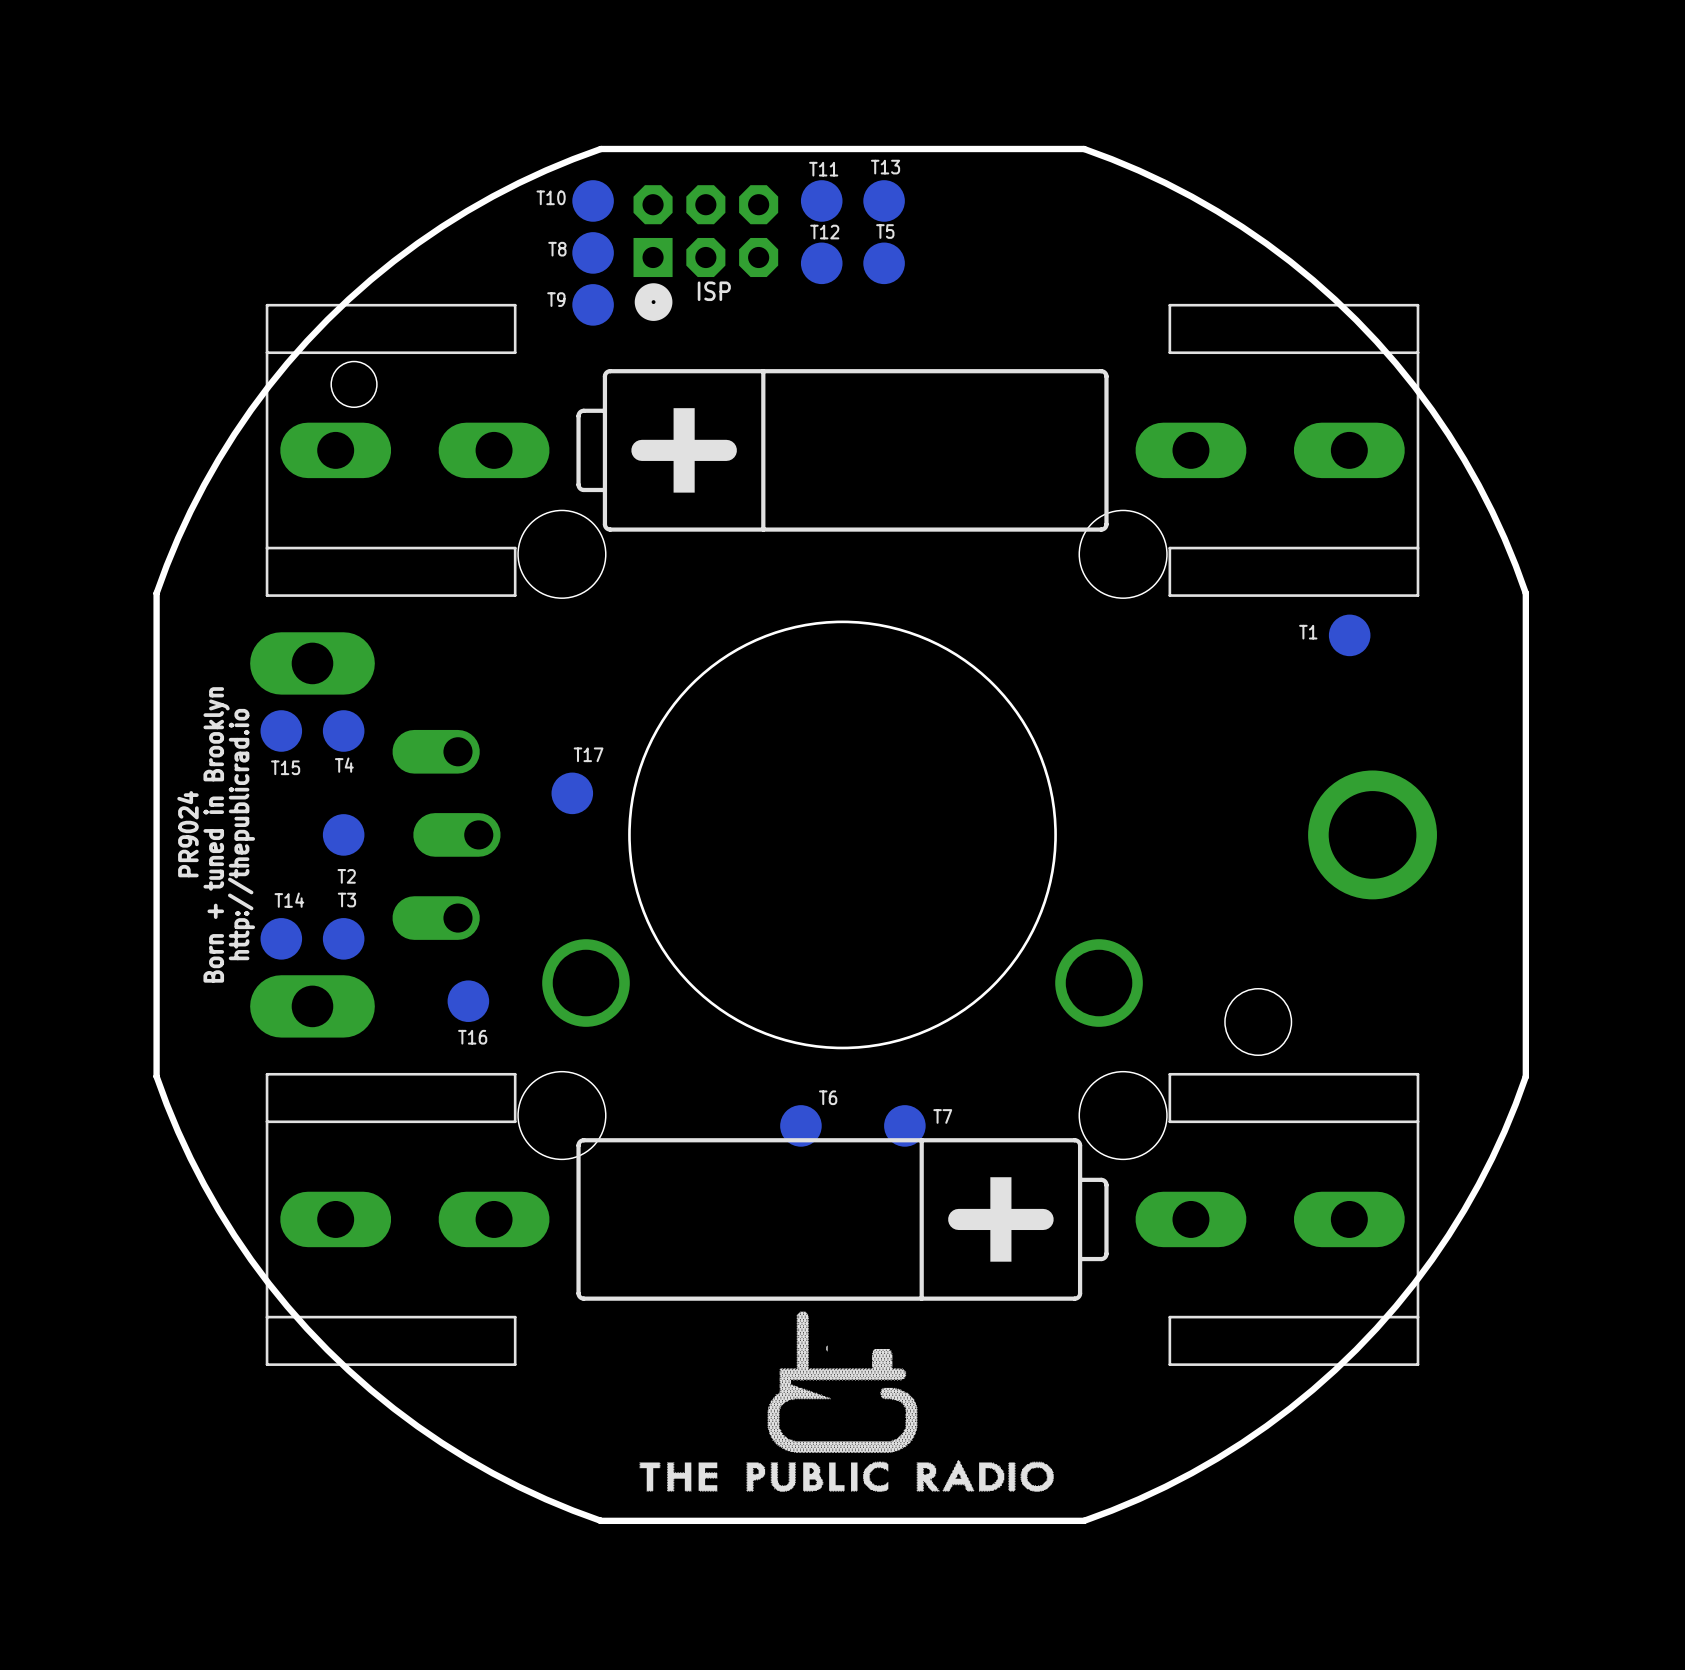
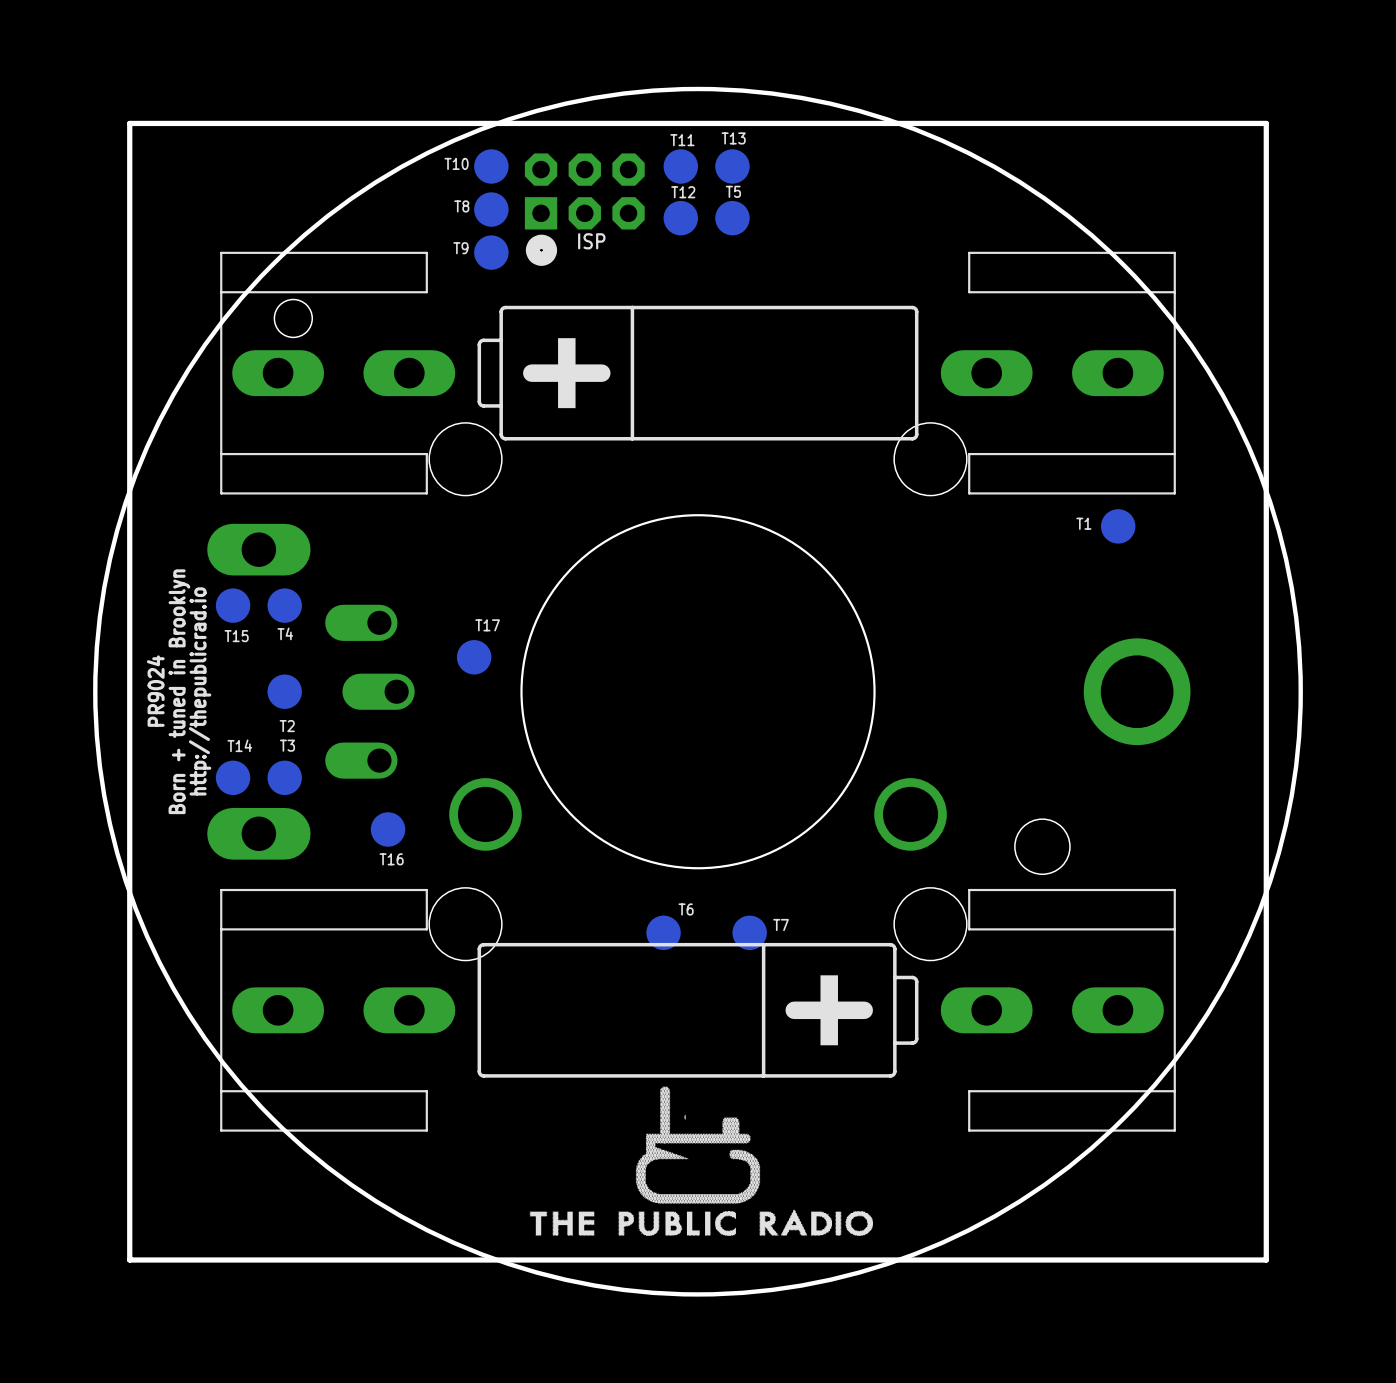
round board edge: none -> [93, 86, 1303, 1297]
board edge: (600, 149) (545, 170) (467, 211) (393, 261) (327, 319) (268, 386) (218, 459) (178, 538) (156, 593) -> (497, 123) (129, 123) (129, 491)
board edge: (1084, 149) (1138, 170) (1217, 211) (1290, 261) (1356, 320) (1414, 386) (1448, 434) (1492, 511) (1525, 593) (1525, 1076) (1492, 1158) (1448, 1235) (1414, 1283) (1376, 1328) (1313, 1389) (1266, 1426) (1217, 1458) (1138, 1499) (1084, 1520) -> (898, 123) (1266, 123) (1266, 1260) (898, 1260)
board edge: (156, 1076) (178, 1131) (218, 1210) (268, 1283) (327, 1349) (393, 1408) (467, 1458) (545, 1499) (600, 1520) -> (129, 891) (129, 1260) (497, 1260)

